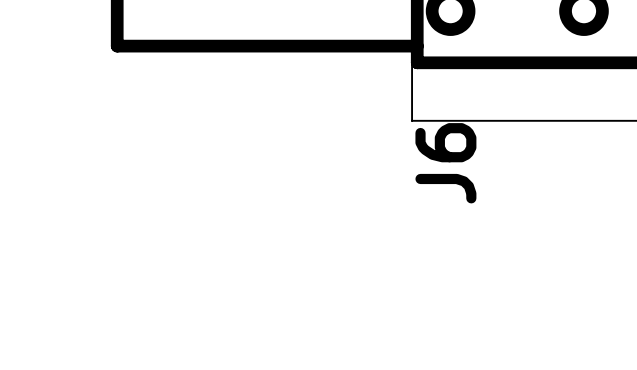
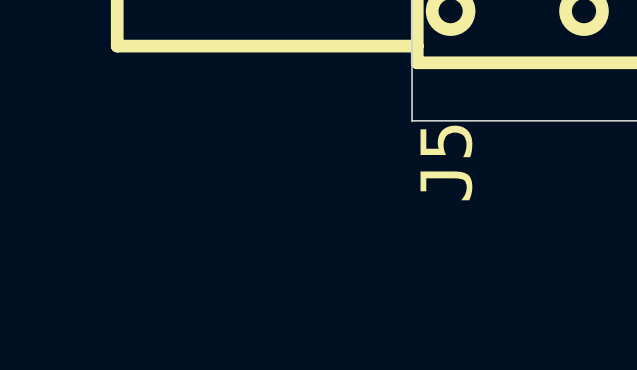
J6 name: J6 (445, 163) -> J5 (446, 162)

